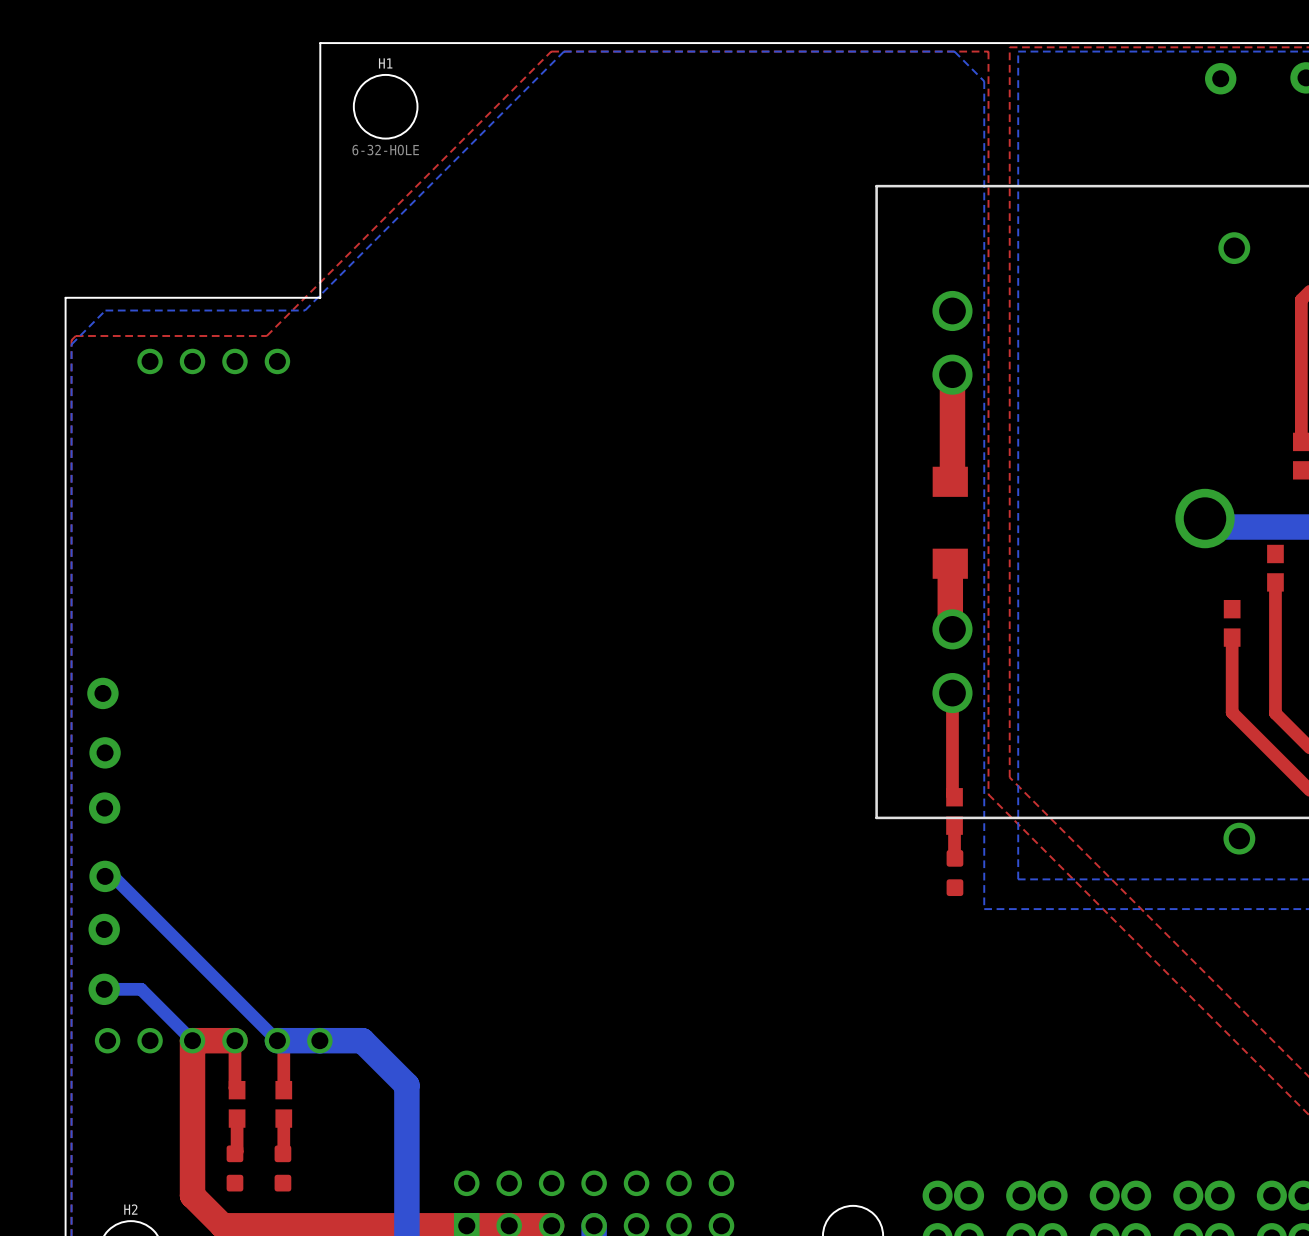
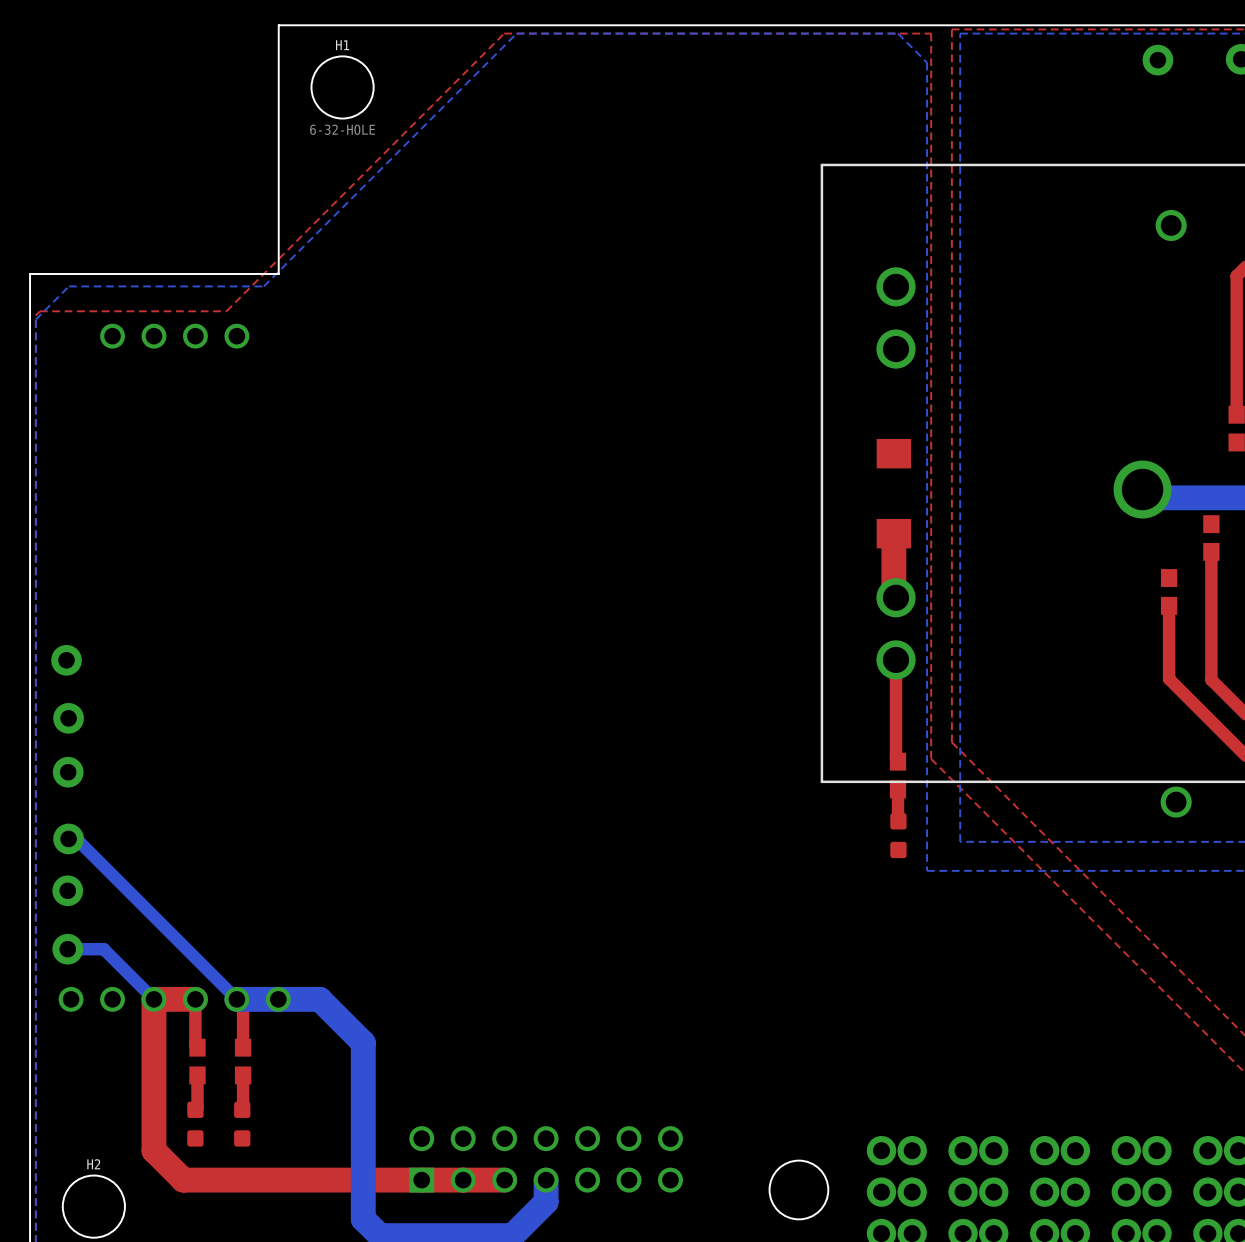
top track: (952, 374) (952, 479) (950, 481) -> none

